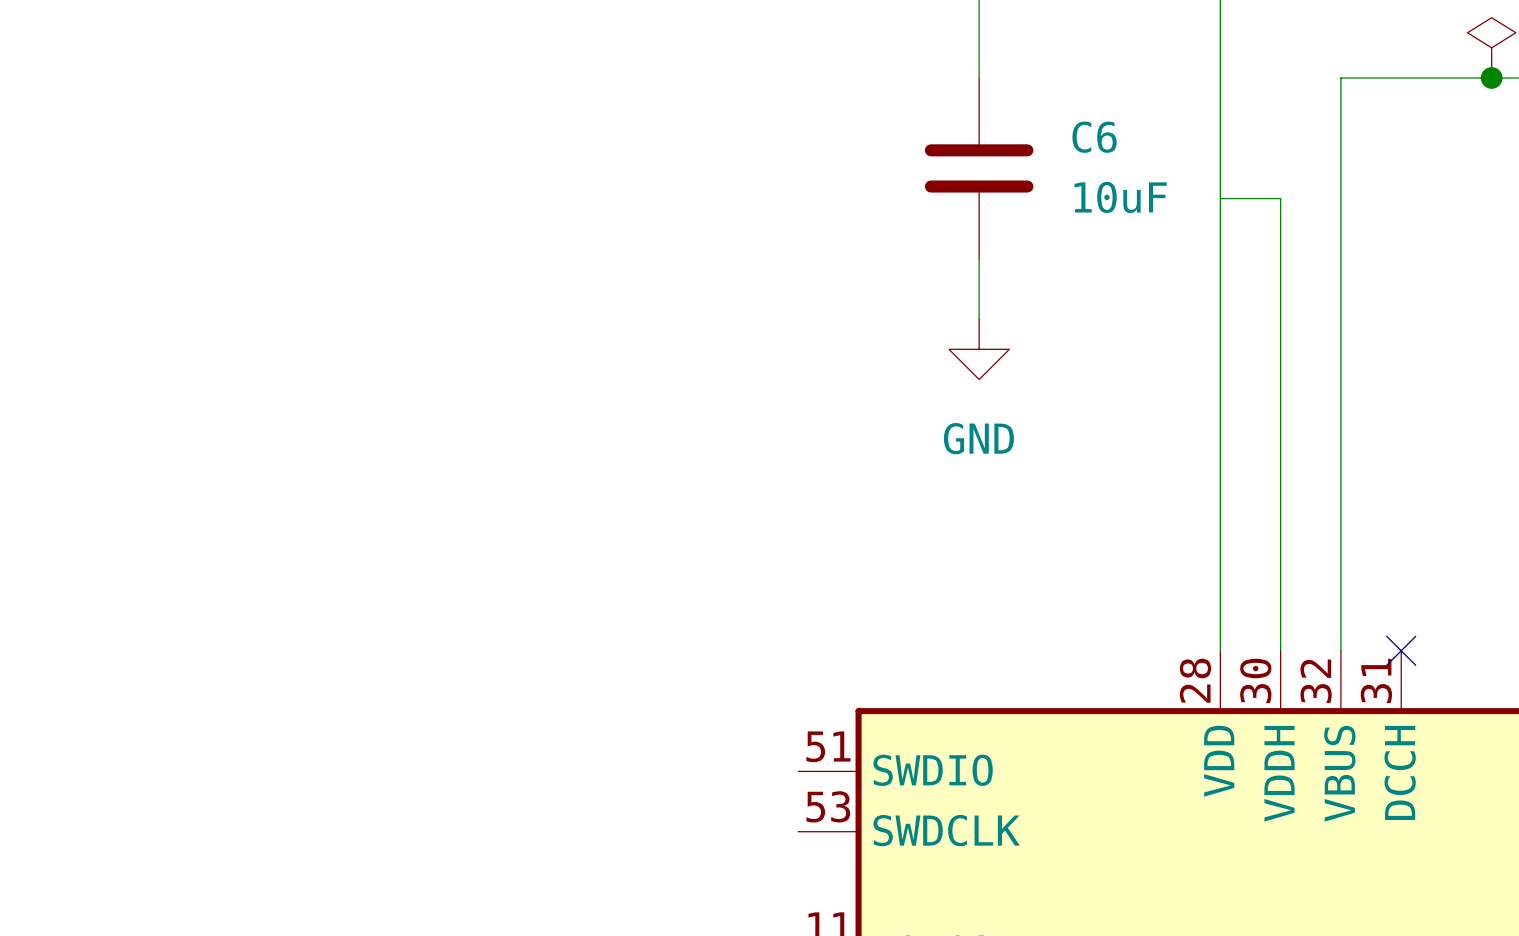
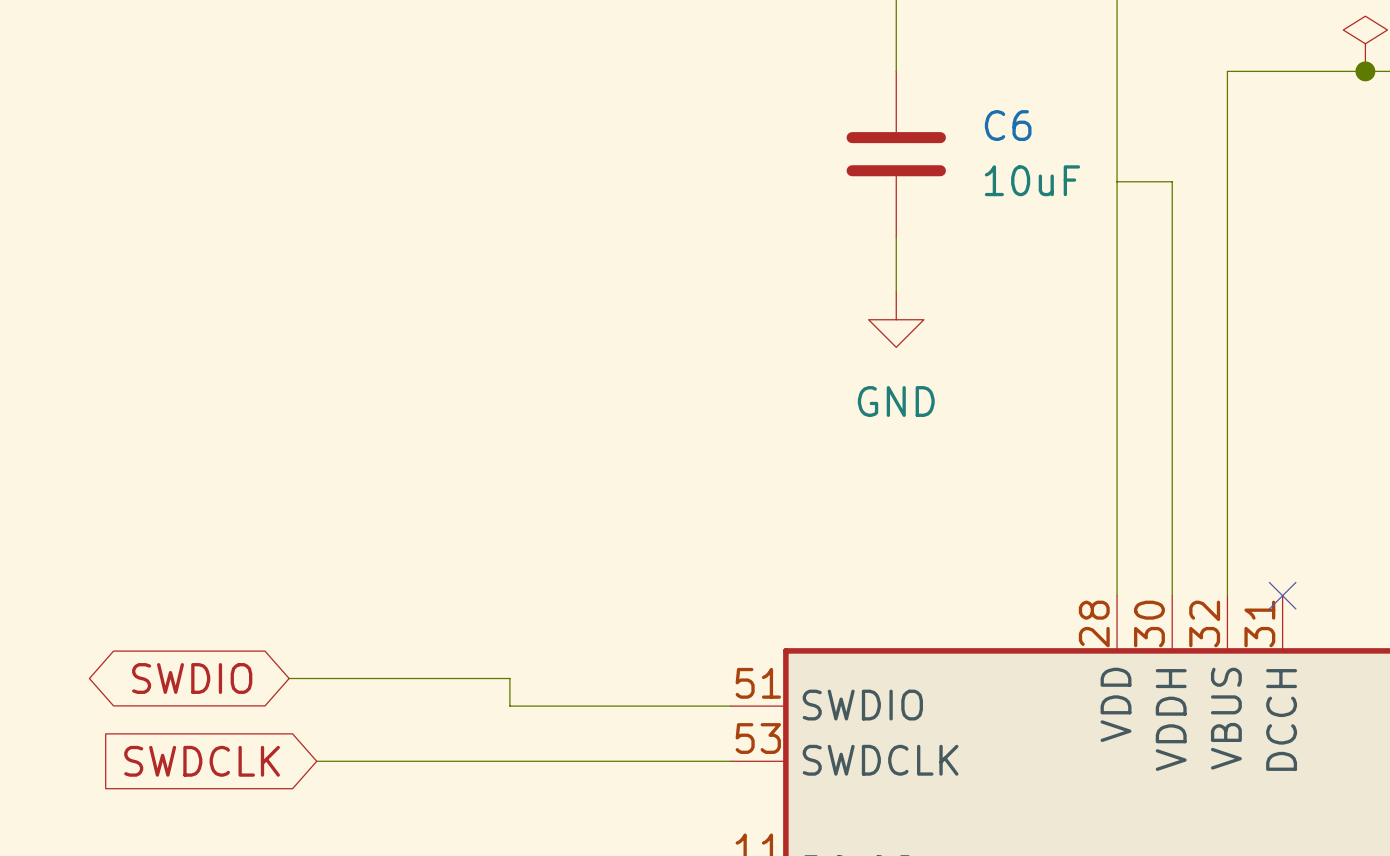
global label: none -> SWDIO (192, 678)
wire: none -> (289, 678) (509, 678) (509, 706) (730, 706)
global label: none -> SWDCLK (202, 761)
wire: none -> (316, 761) (730, 761)

